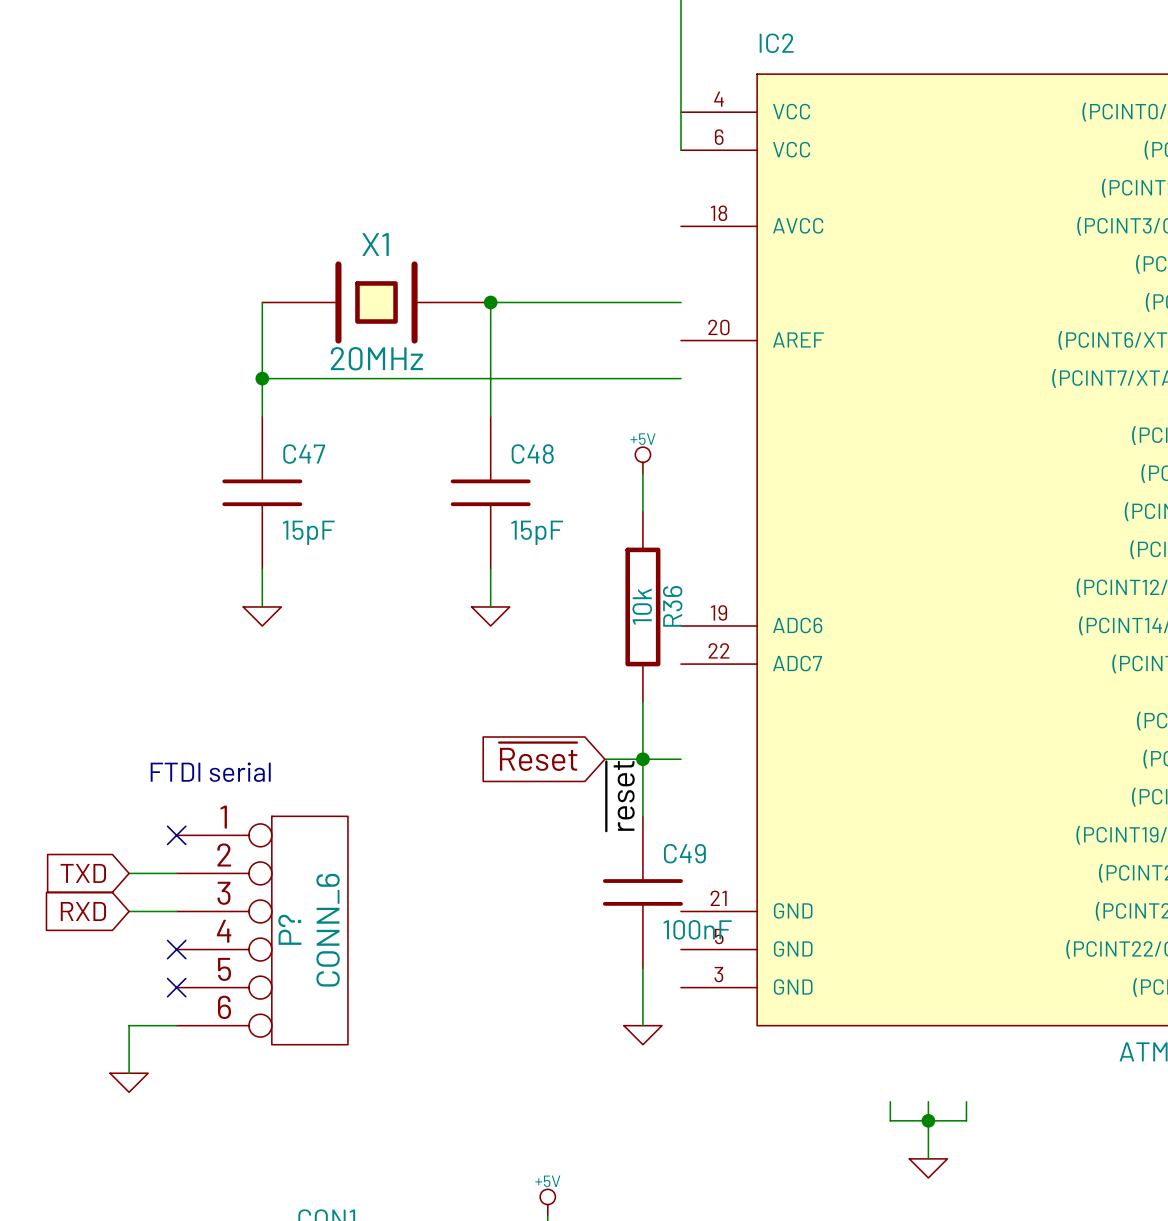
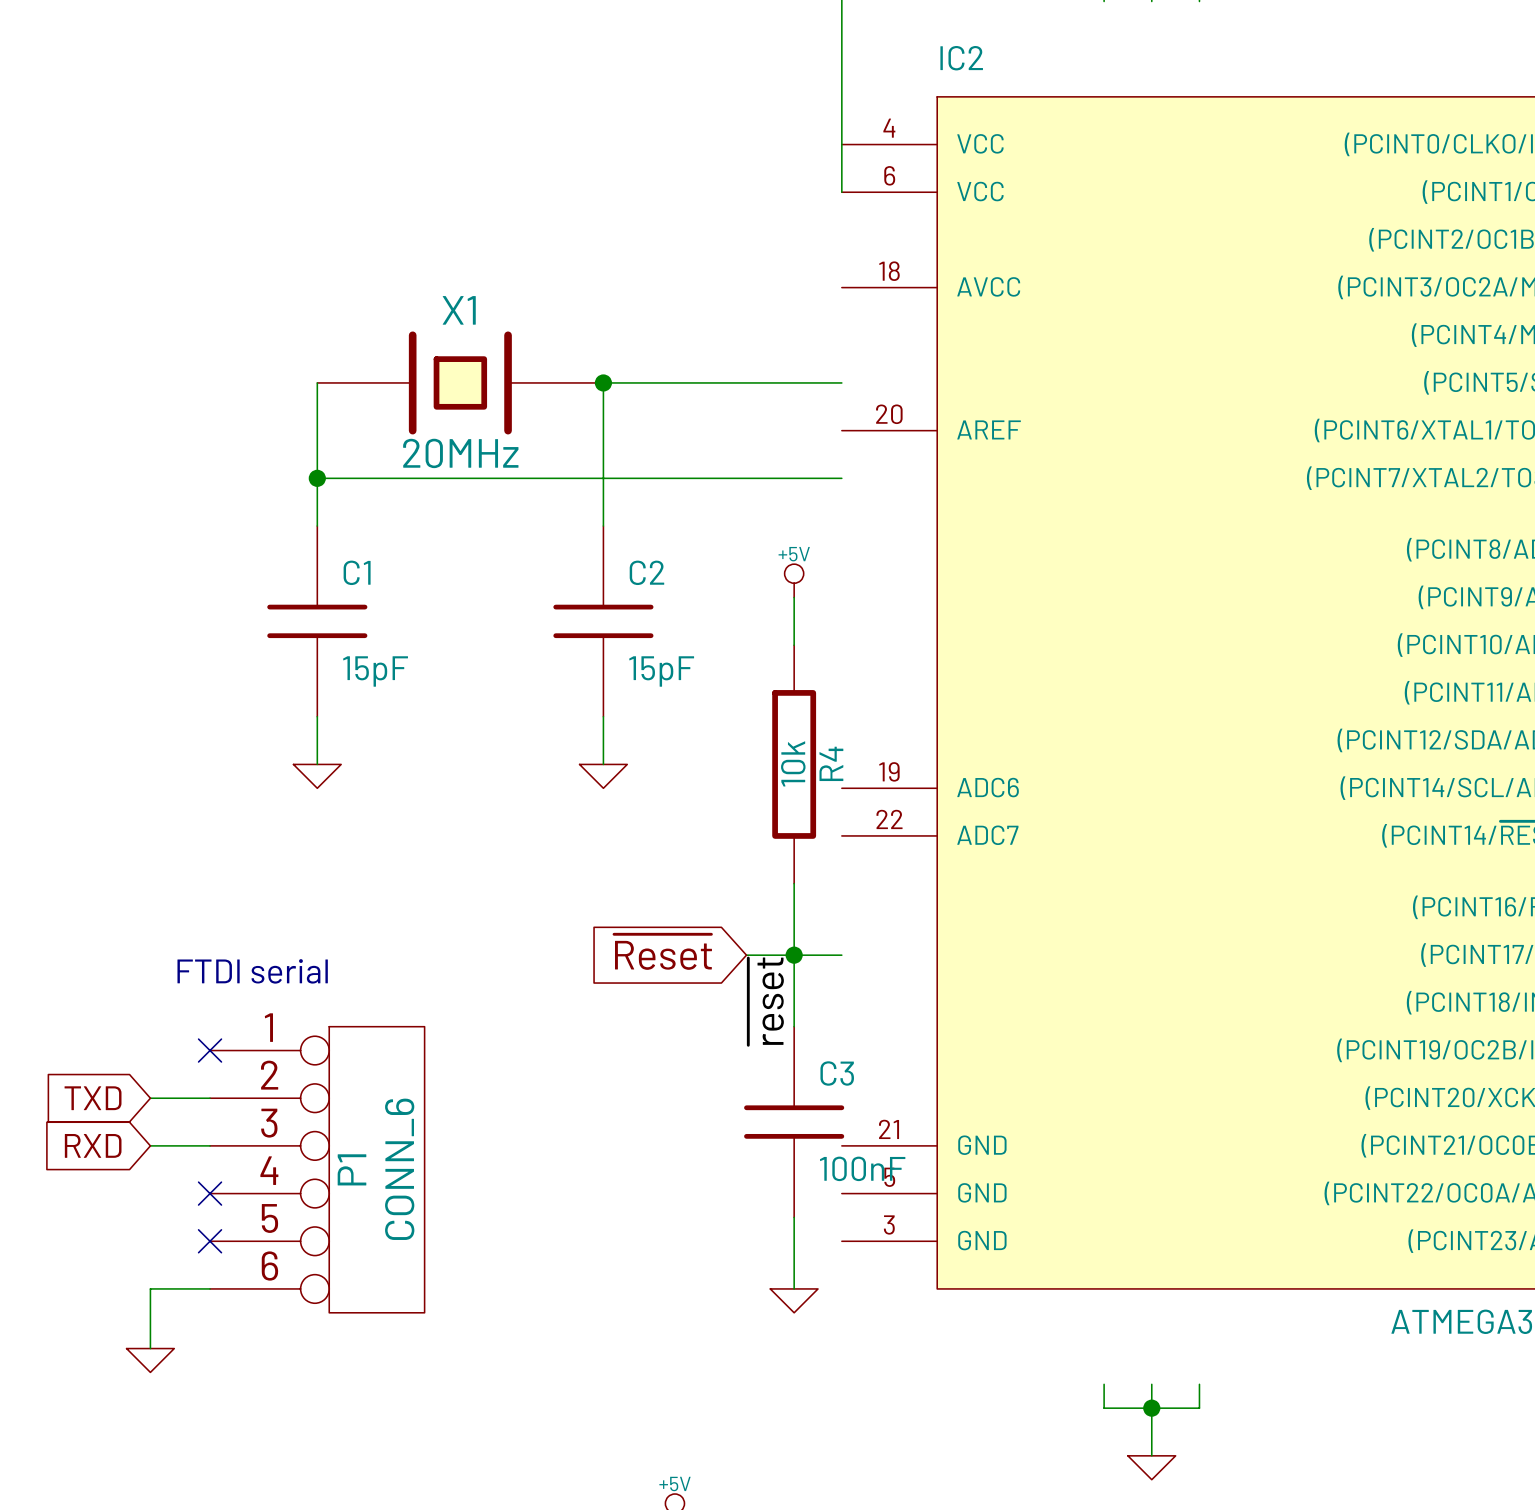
C47 name: C47 (304, 454) -> C1 (357, 572)
C48 name: C48 (532, 454) -> C2 (646, 572)
R36 name: R36 (672, 606) -> R4 (831, 763)
C49 name: C49 (684, 853) -> C3 (837, 1073)
P? name: P? (289, 929) -> P1 (351, 1169)

